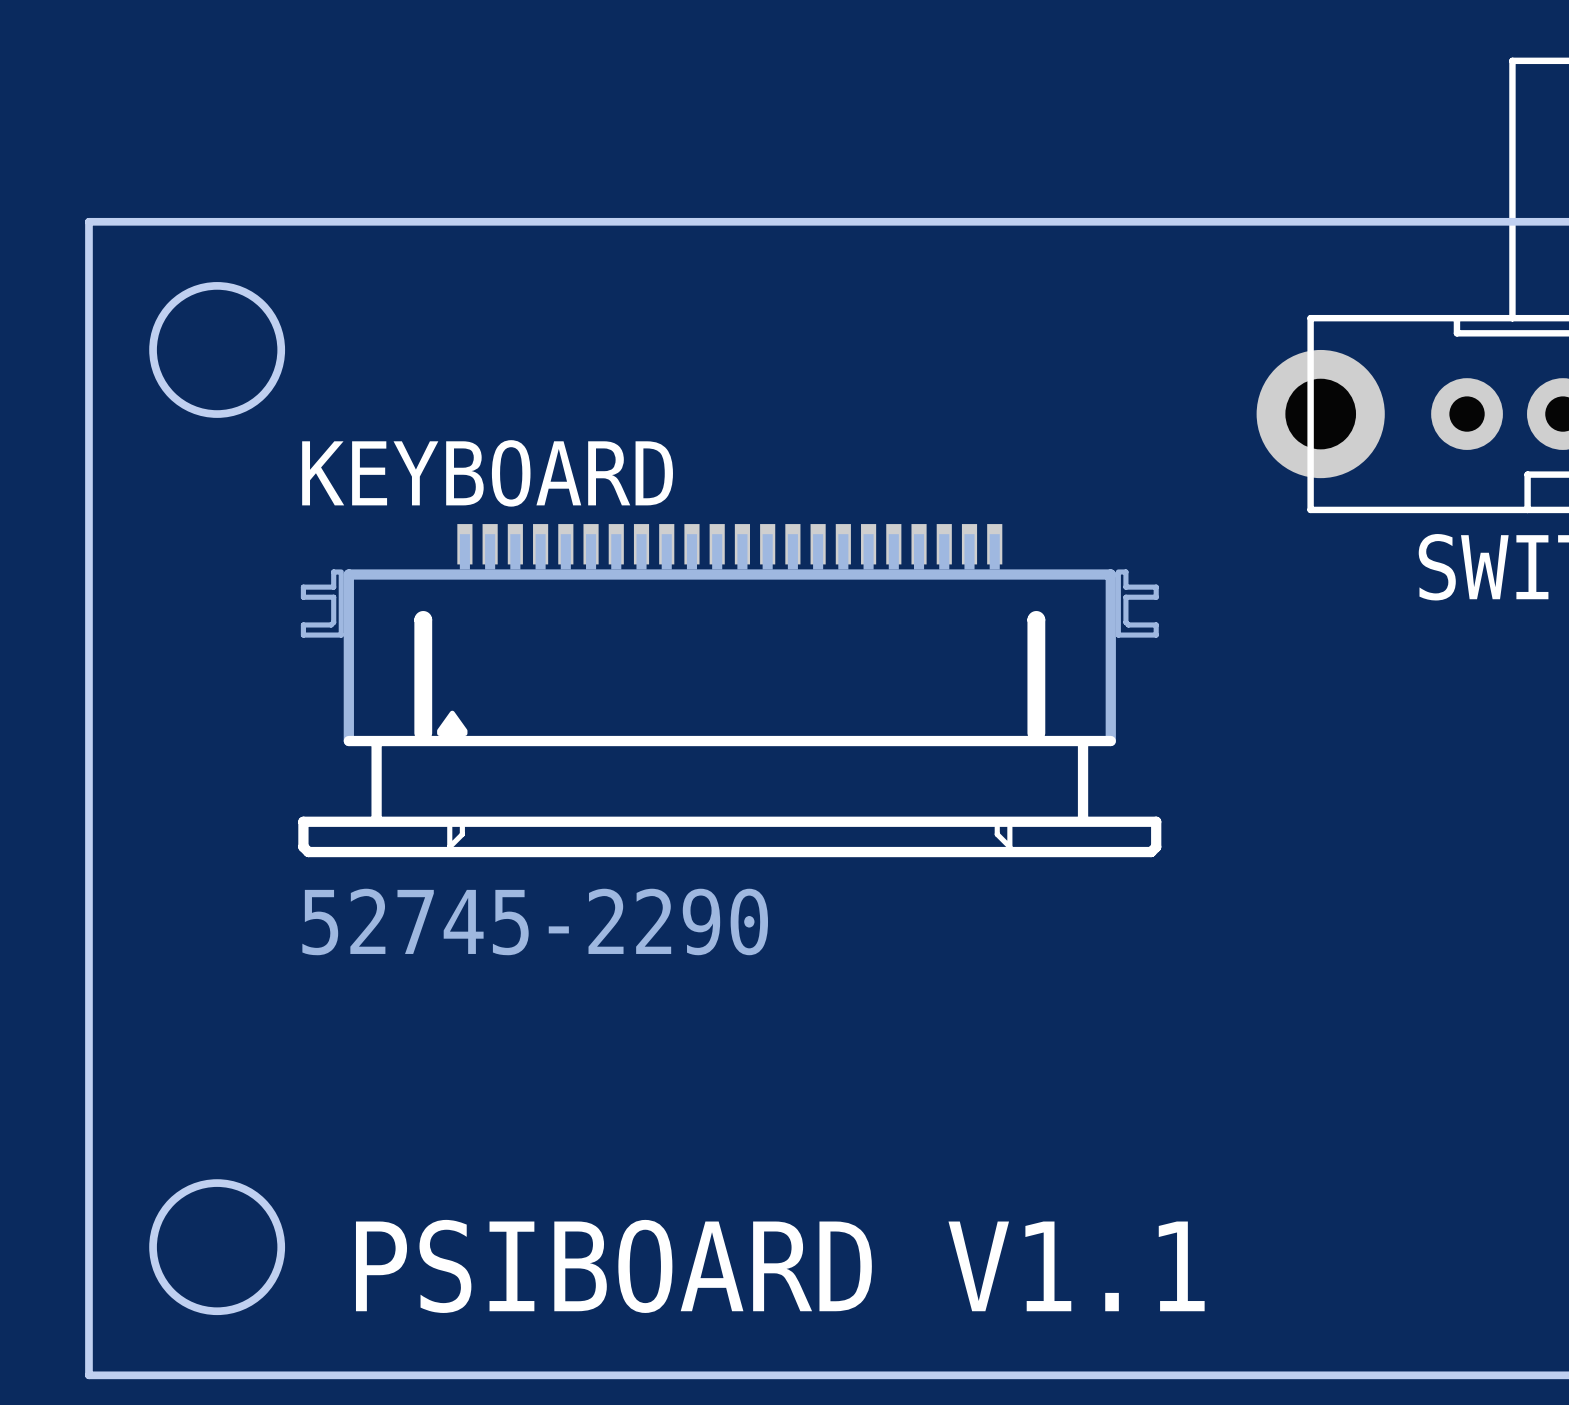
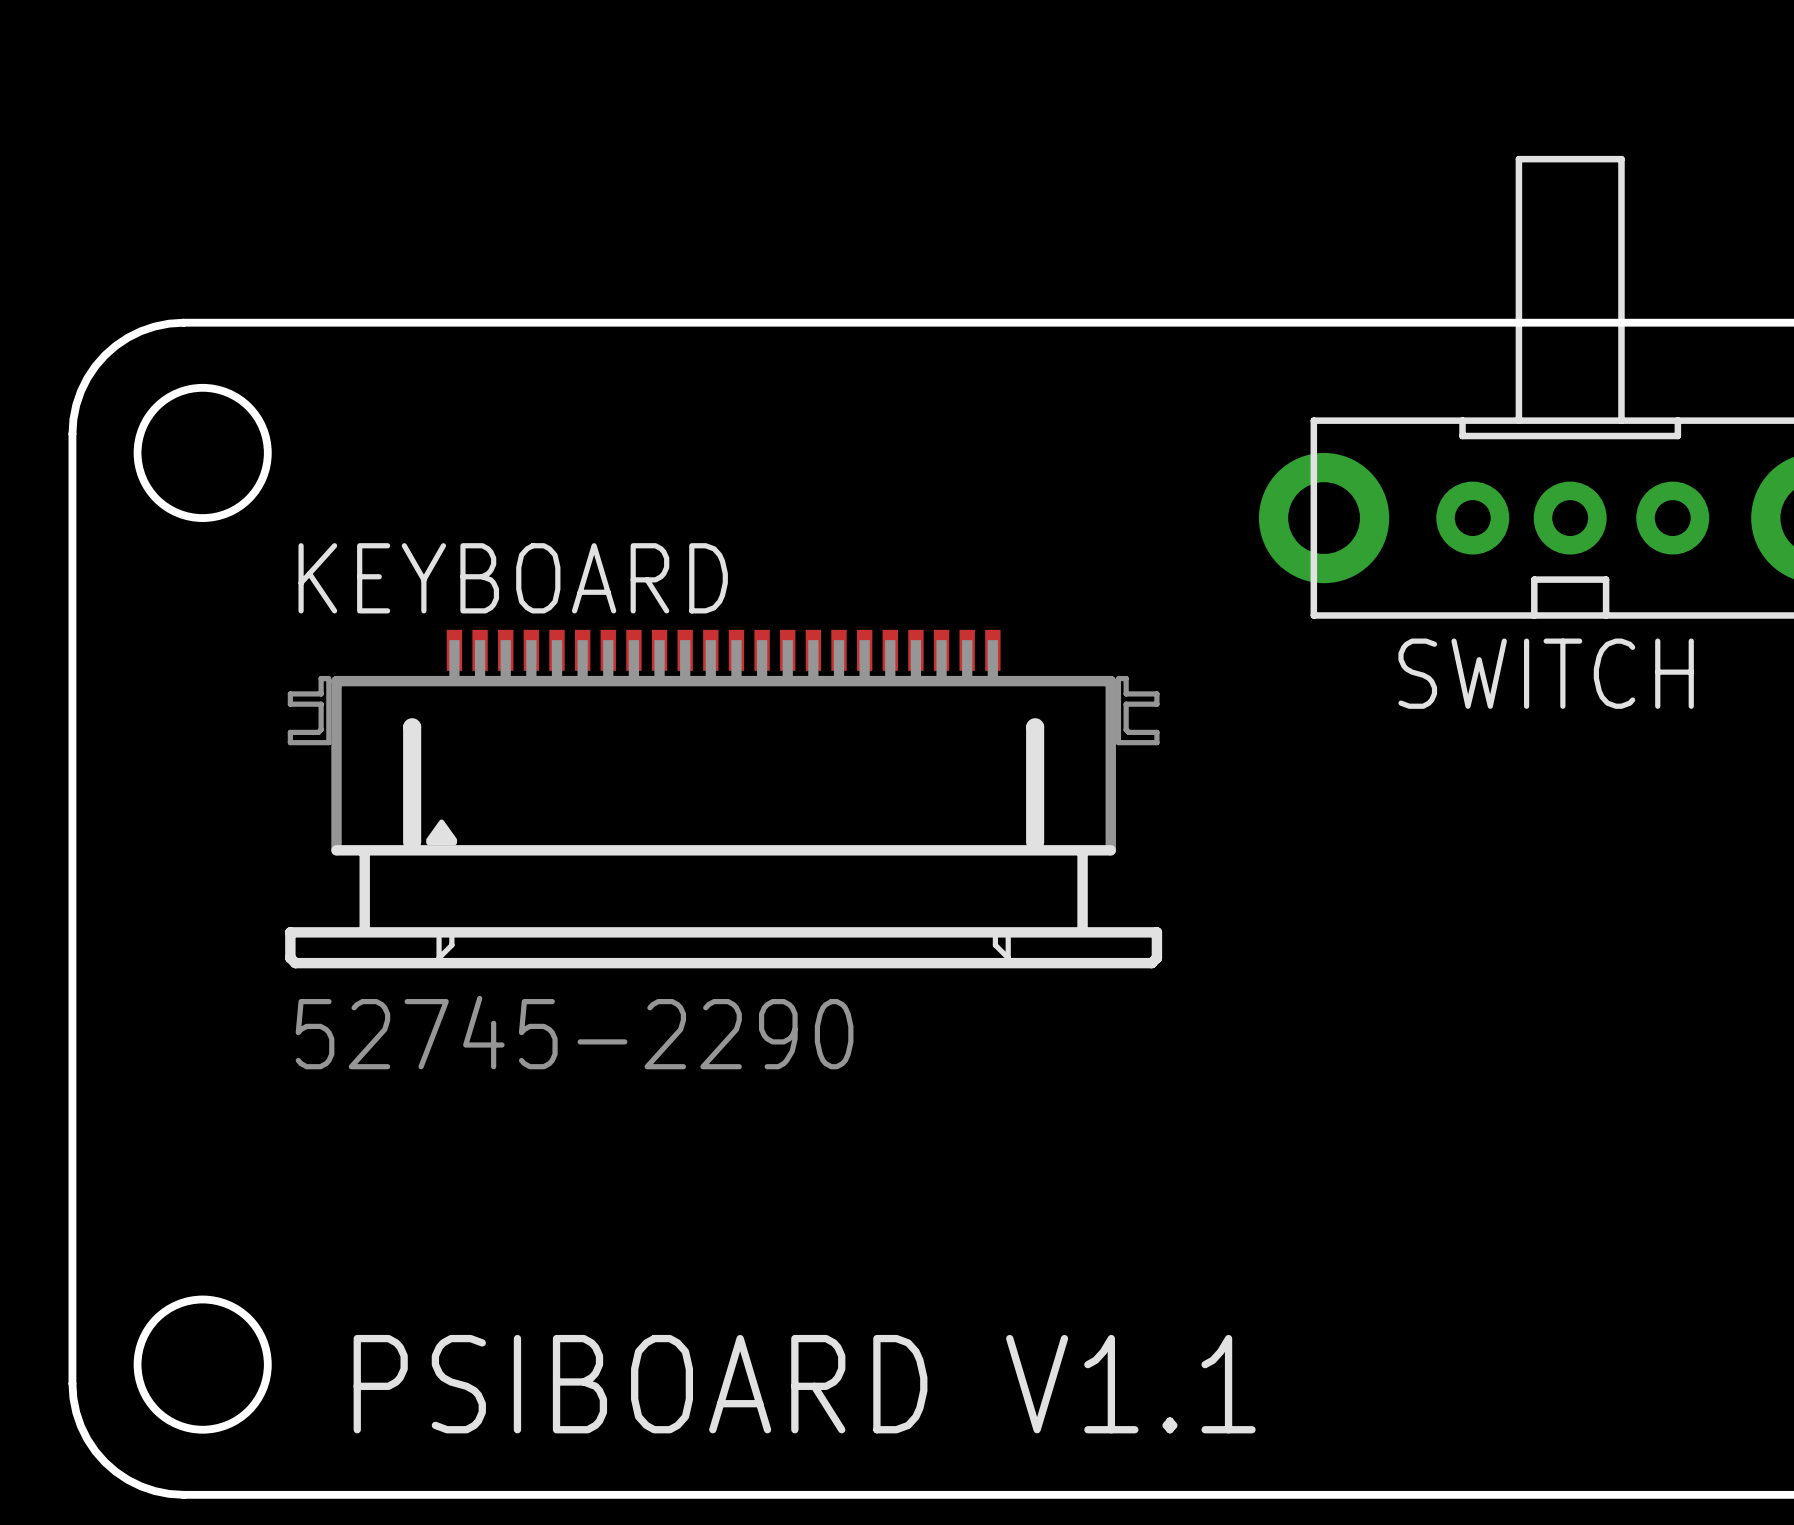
board edge: (198, 221) (88, 221) (88, 331) -> (183, 322) (169, 323) (141, 331) (115, 345) (105, 355) (95, 366) (80, 391) (73, 419) (72, 433)
board edge: (88, 1265) (88, 1375) (198, 1375) -> (72, 1383) (73, 1398) (80, 1426) (95, 1451) (105, 1462) (115, 1471) (141, 1486) (169, 1493) (183, 1494)

